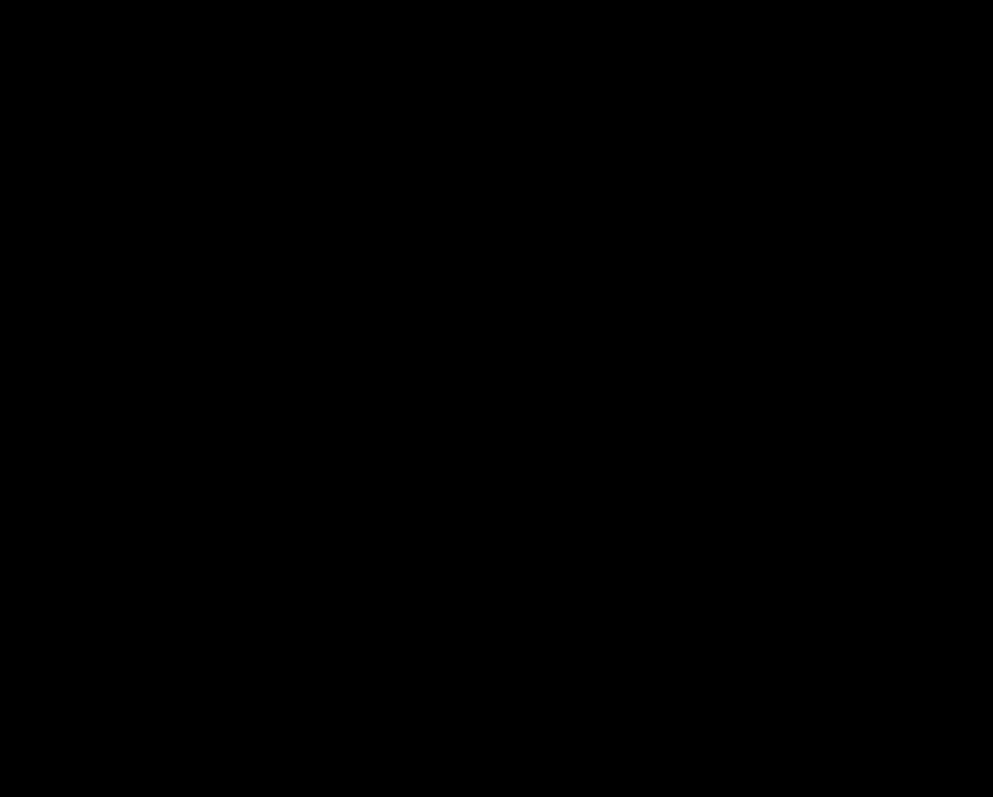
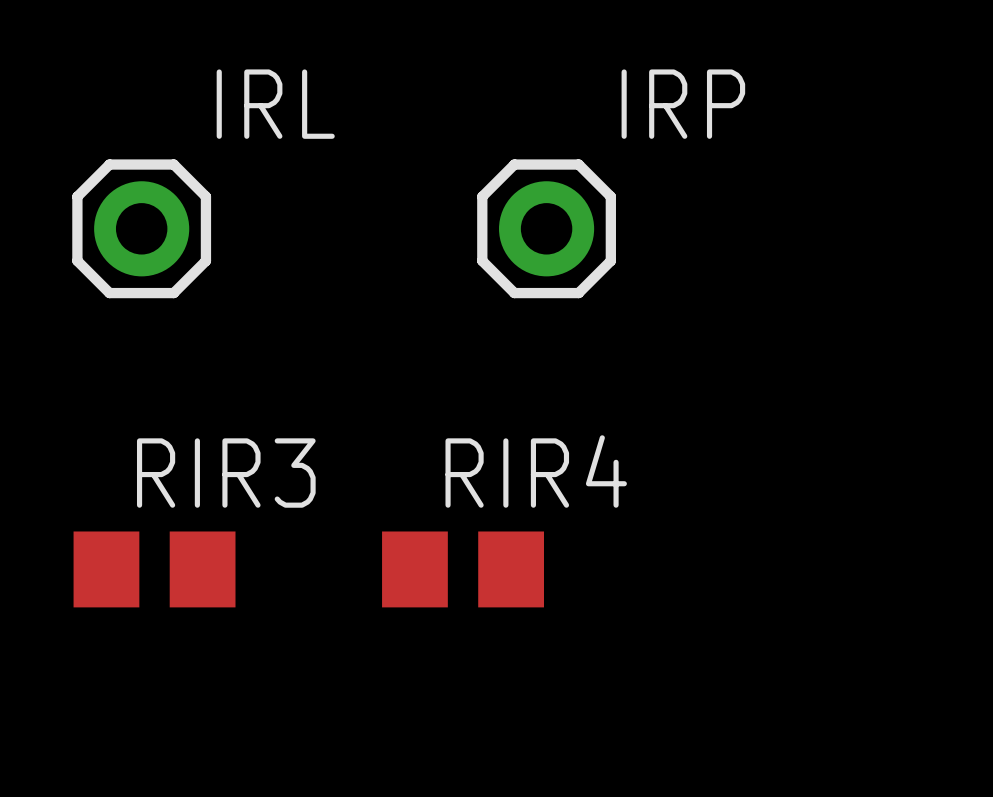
IRL: none -> (141, 228)
IRP: none -> (546, 228)
RIR3: none -> (154, 569)
RIR4: none -> (463, 569)

